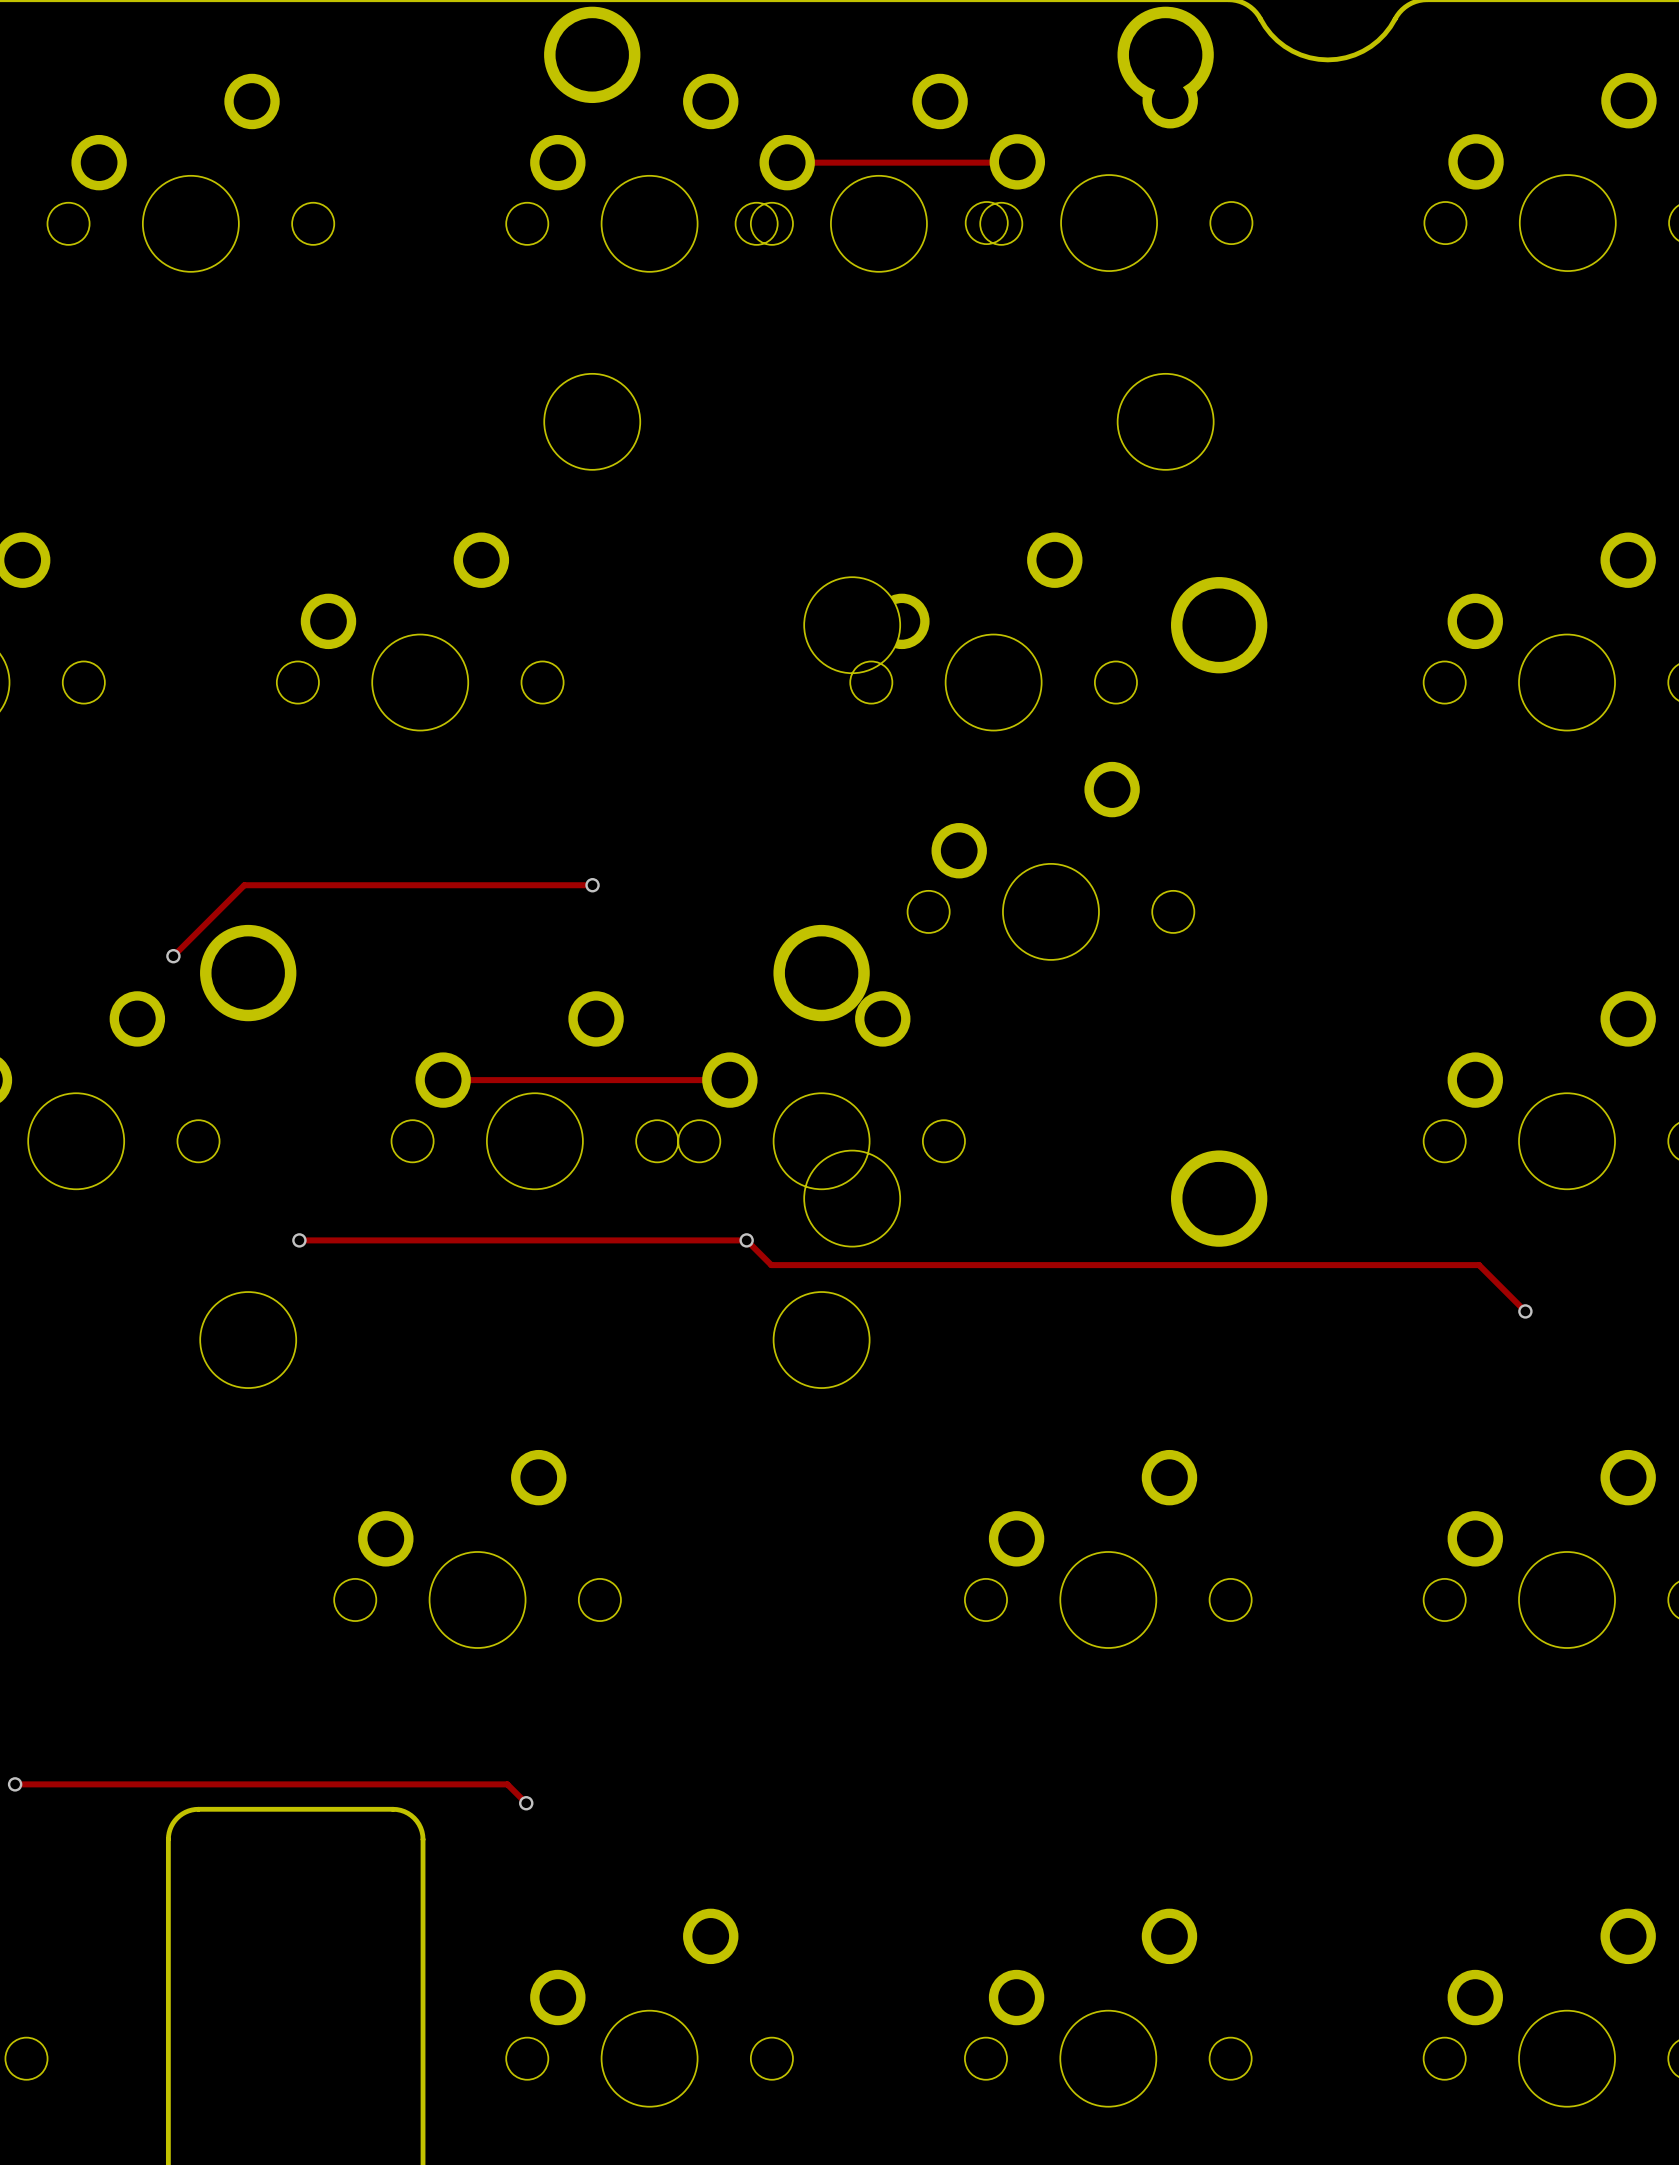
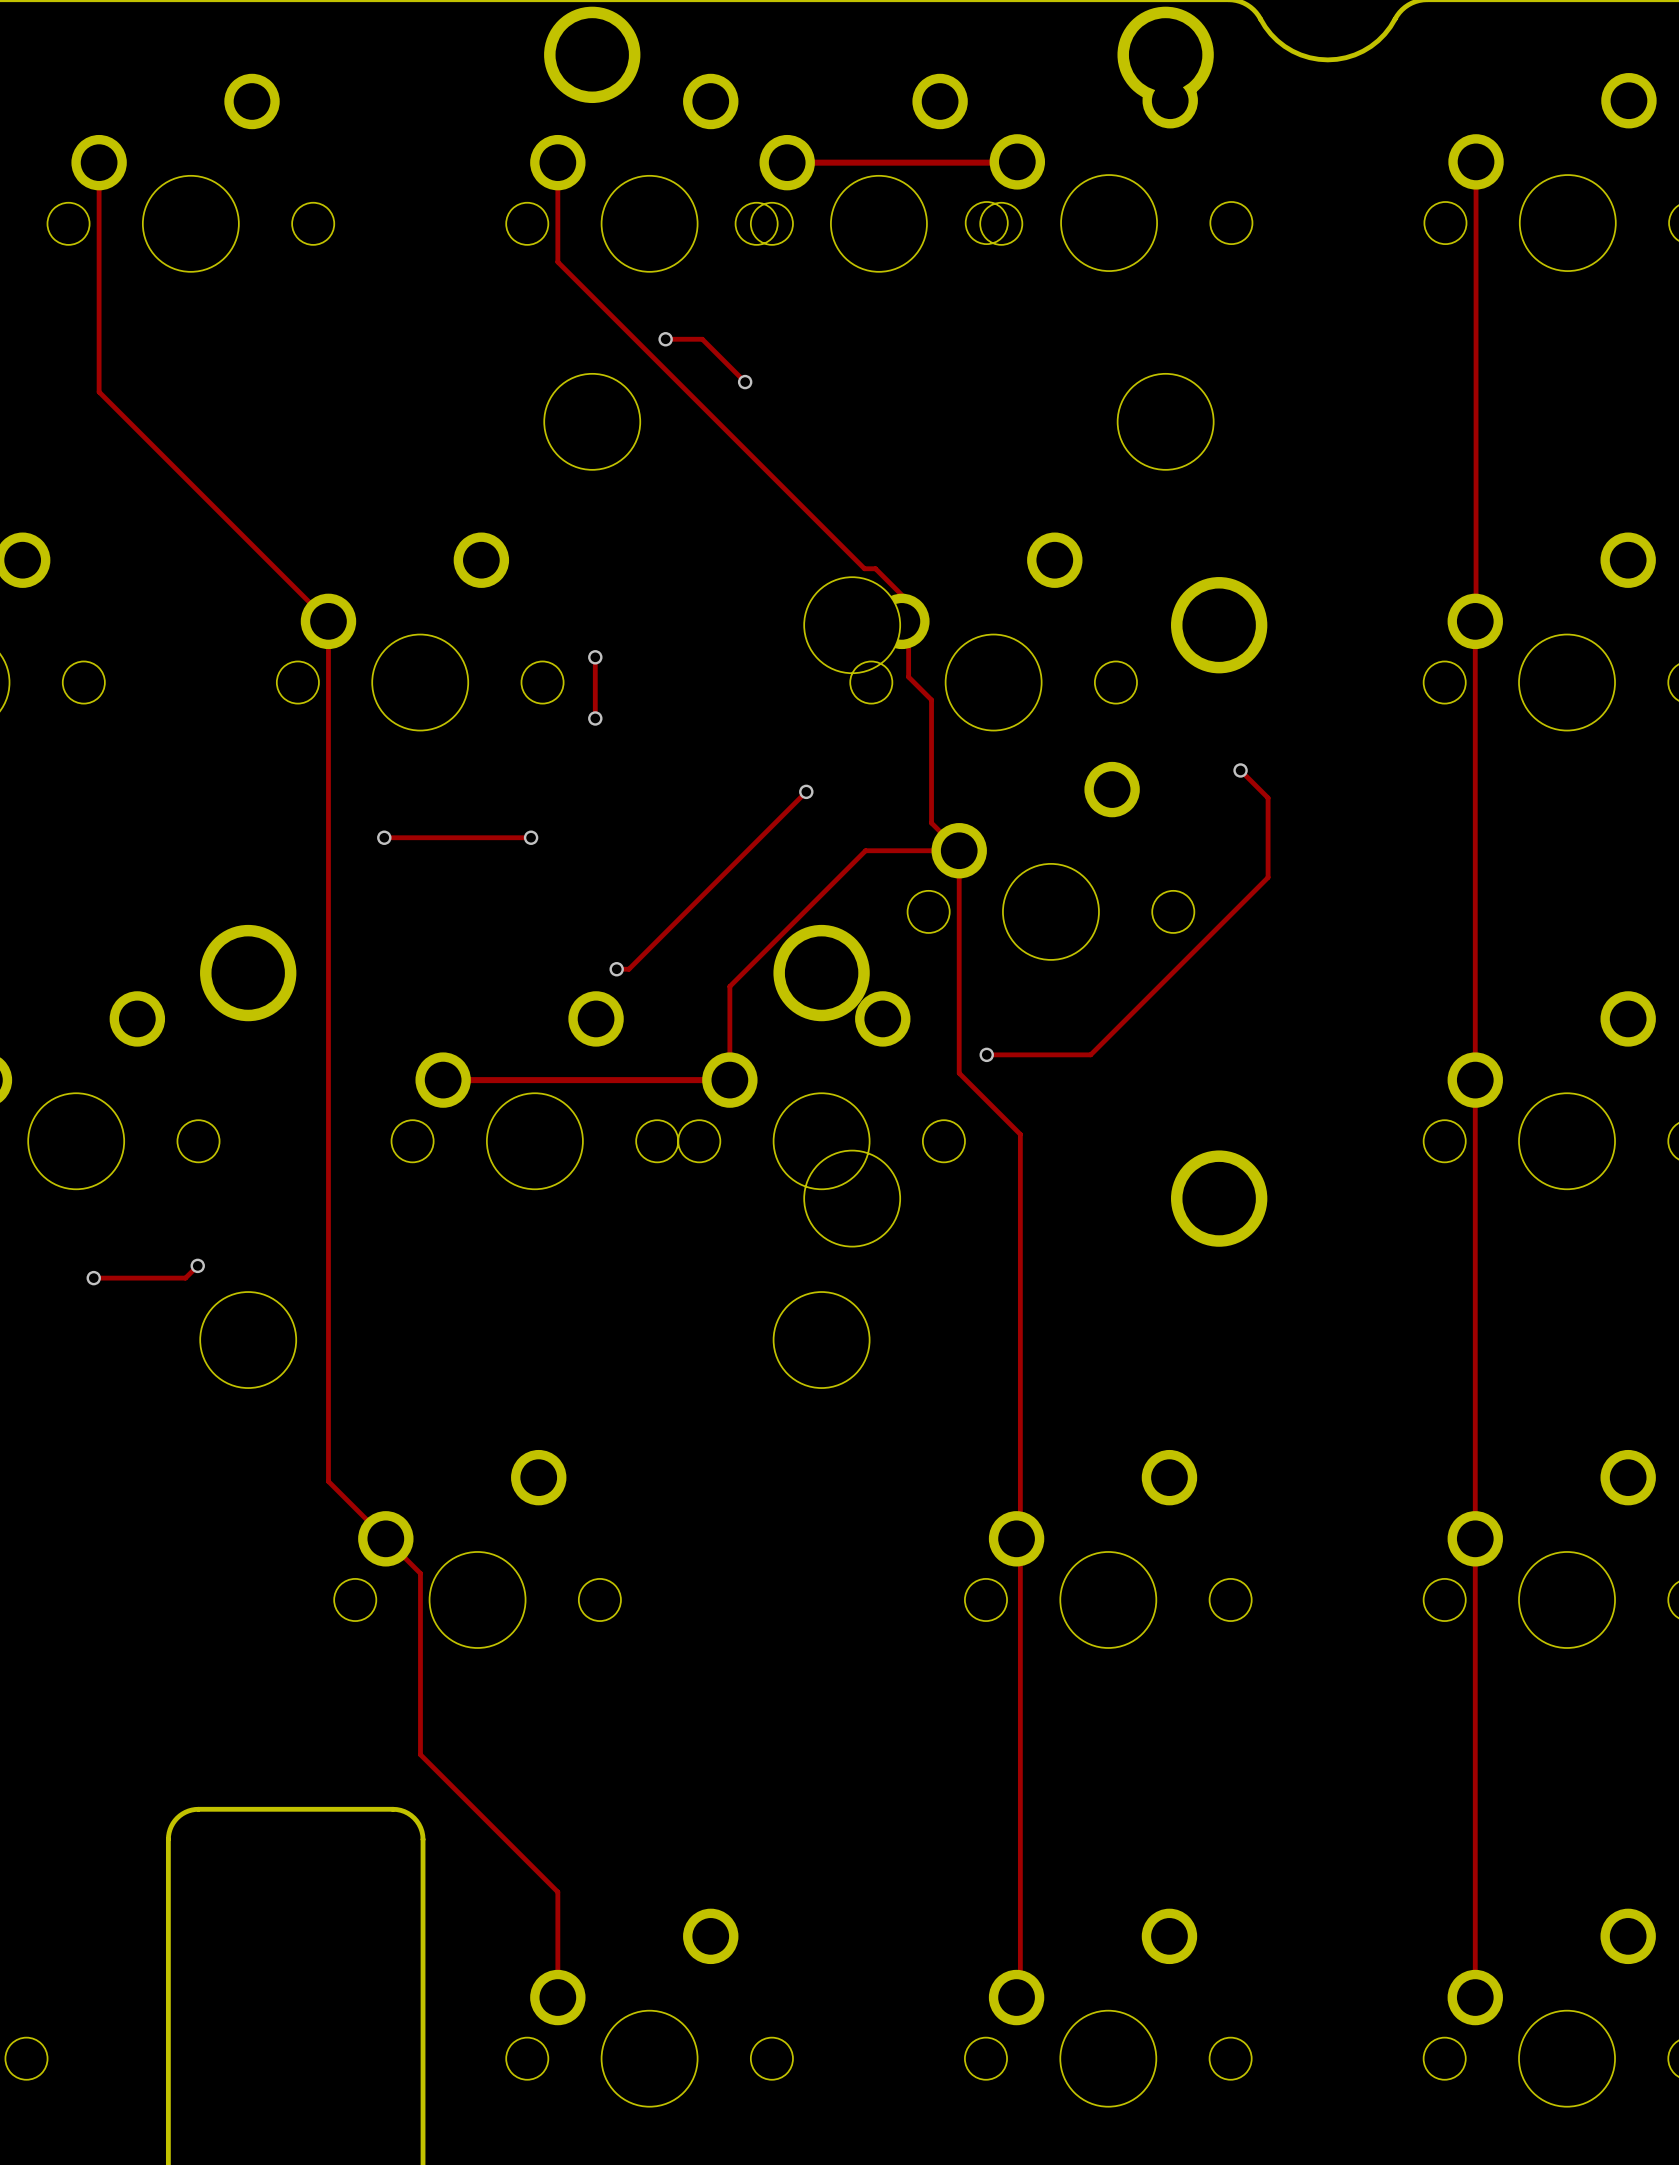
track: none -> (1476, 161) (1475, 1997)
track: none -> (99, 162) (99, 392) (328, 621) (328, 1481) (420, 1573) (420, 1754) (557, 1892) (557, 1997)
track: none -> (557, 162) (557, 262) (864, 568) (875, 568) (908, 601) (908, 677) (931, 699) (931, 823) (959, 850)
track: none -> (665, 339) (702, 339) (745, 382)
via: none -> (665, 339)
via: none -> (745, 382)
track: none -> (595, 657) (595, 718)
via: none -> (595, 657)
via: none -> (595, 718)
track: none -> (1240, 770) (1268, 797) (1268, 877) (1090, 1054) (986, 1054)
via: none -> (1240, 770)
track: none -> (806, 791) (628, 969) (616, 969)
via: none -> (806, 791)
track: none -> (384, 837) (531, 837)
via: none -> (384, 837)
via: none -> (531, 837)
track: none -> (959, 850) (865, 850) (729, 986) (729, 1080)
track: none -> (959, 850) (959, 1073) (1020, 1134) (1020, 1534) (1016, 1538) (1020, 1542) (1020, 1993) (1016, 1997)
track: (592, 885) (244, 885) (173, 956) -> none
via: (592, 885) -> none
via: (173, 956) -> none
via: none -> (616, 969)
via: none -> (986, 1054)
track: (299, 1240) (746, 1240) (771, 1265) (1479, 1265) (1525, 1311) -> none
via: (299, 1240) -> none
via: (746, 1240) -> none
track: none -> (197, 1265) (185, 1278) (93, 1278)
via: none -> (197, 1265)
via: none -> (93, 1278)
via: (1525, 1311) -> none
track: (15, 1784) (507, 1784) (526, 1803) -> none
via: (15, 1784) -> none
via: (526, 1803) -> none

